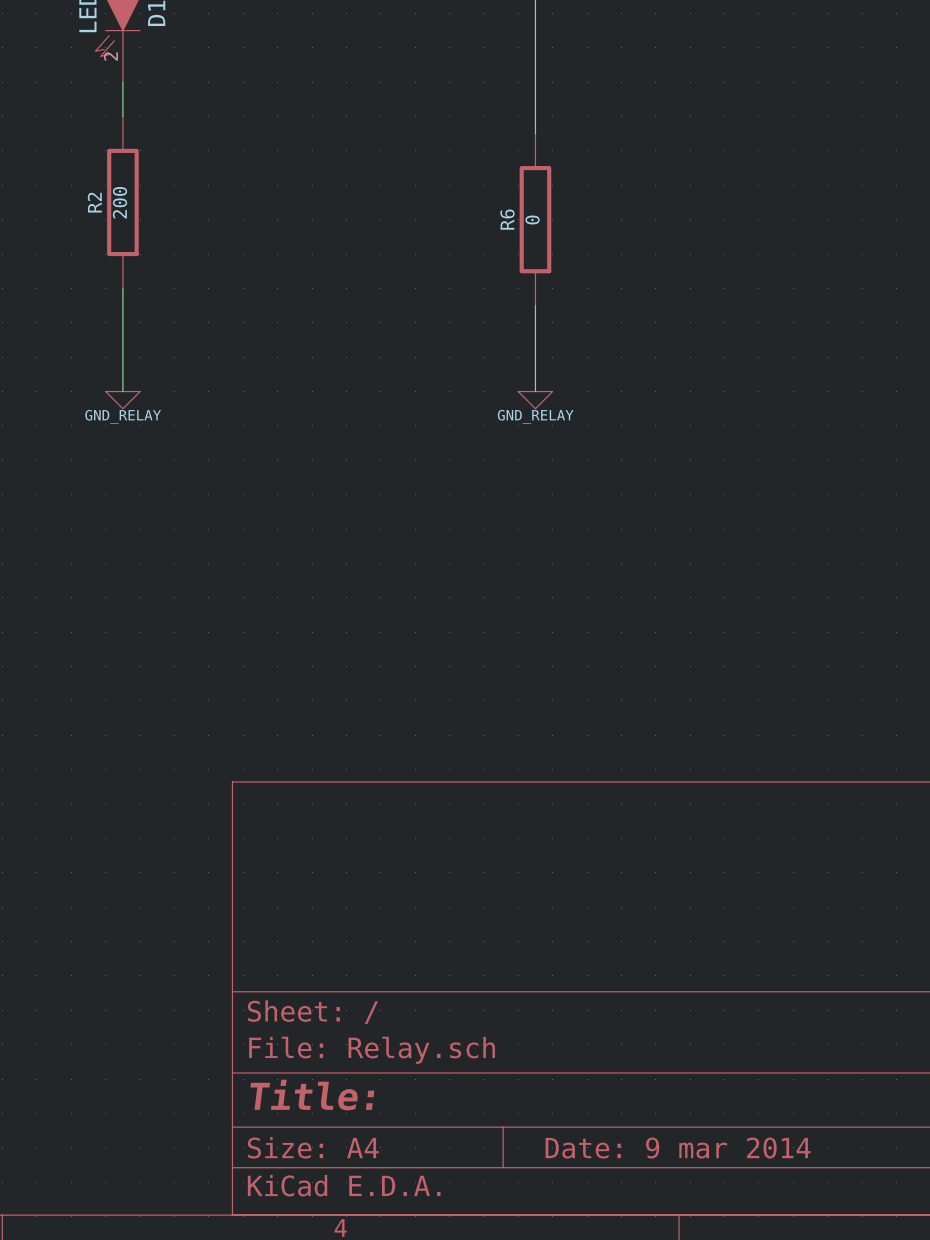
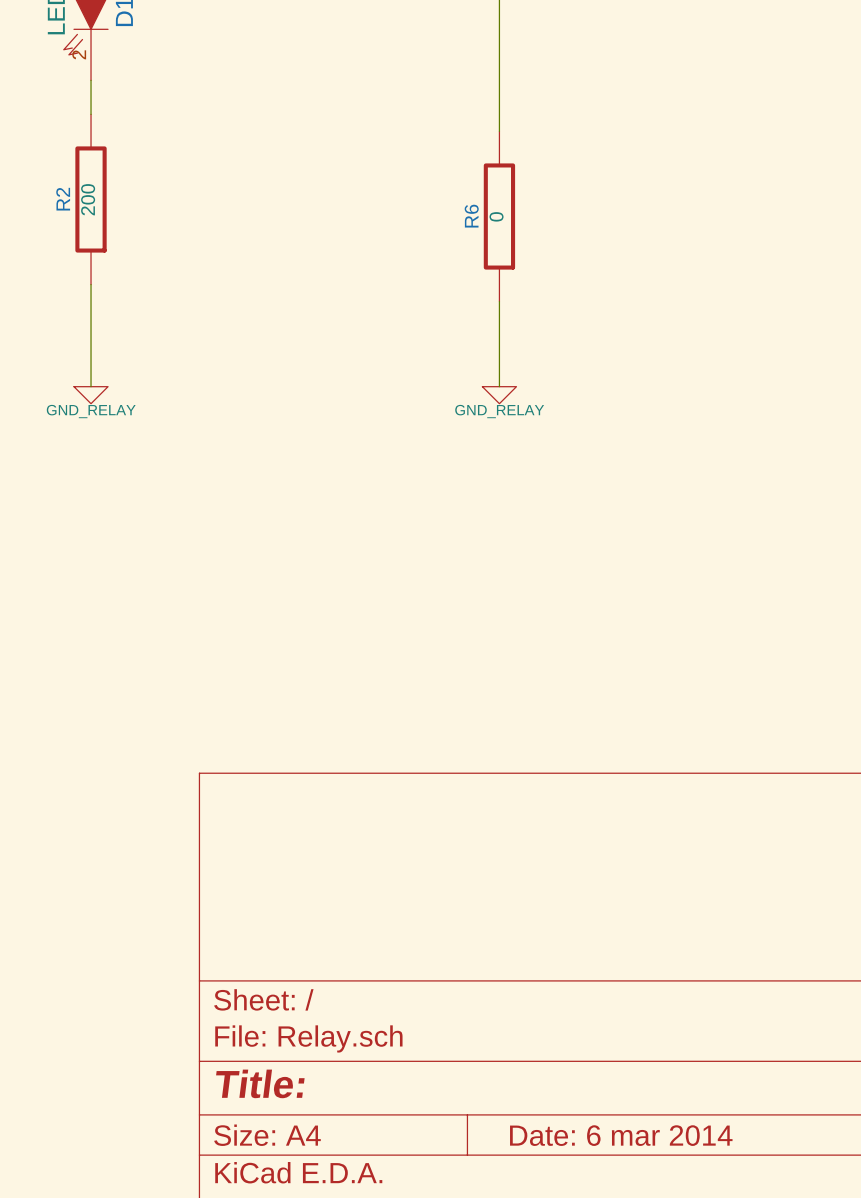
title block: Date: 9 mar 2014 (678, 1148) -> Date: 6 mar 2014 (621, 1135)

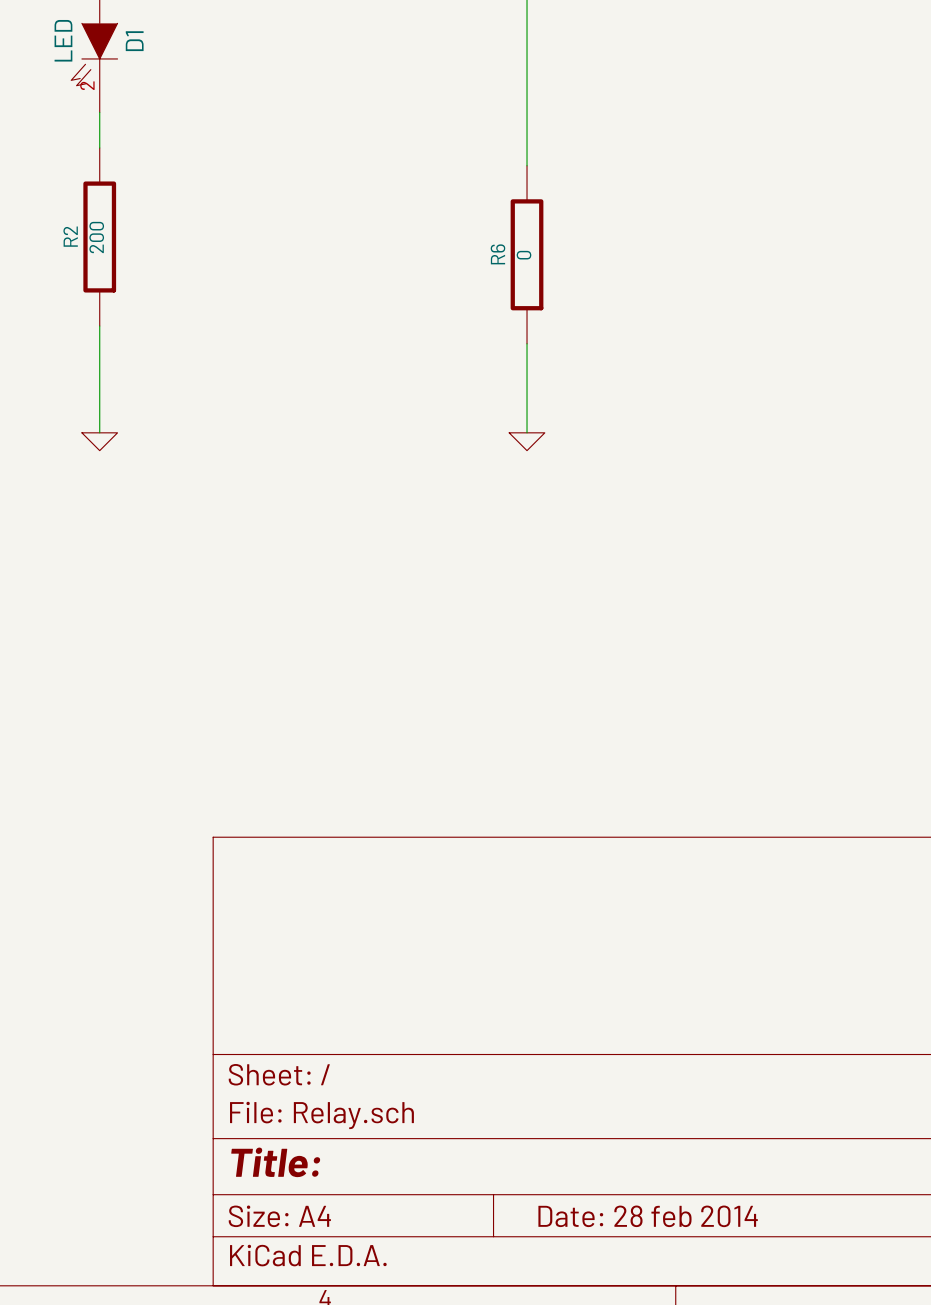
power symbol text: GND_RELAY (91, 411) -> none
power symbol text: GND_RELAY (499, 411) -> none
title block: Date: 6 mar 2014 (621, 1135) -> Date: 28 feb 2014 (648, 1216)

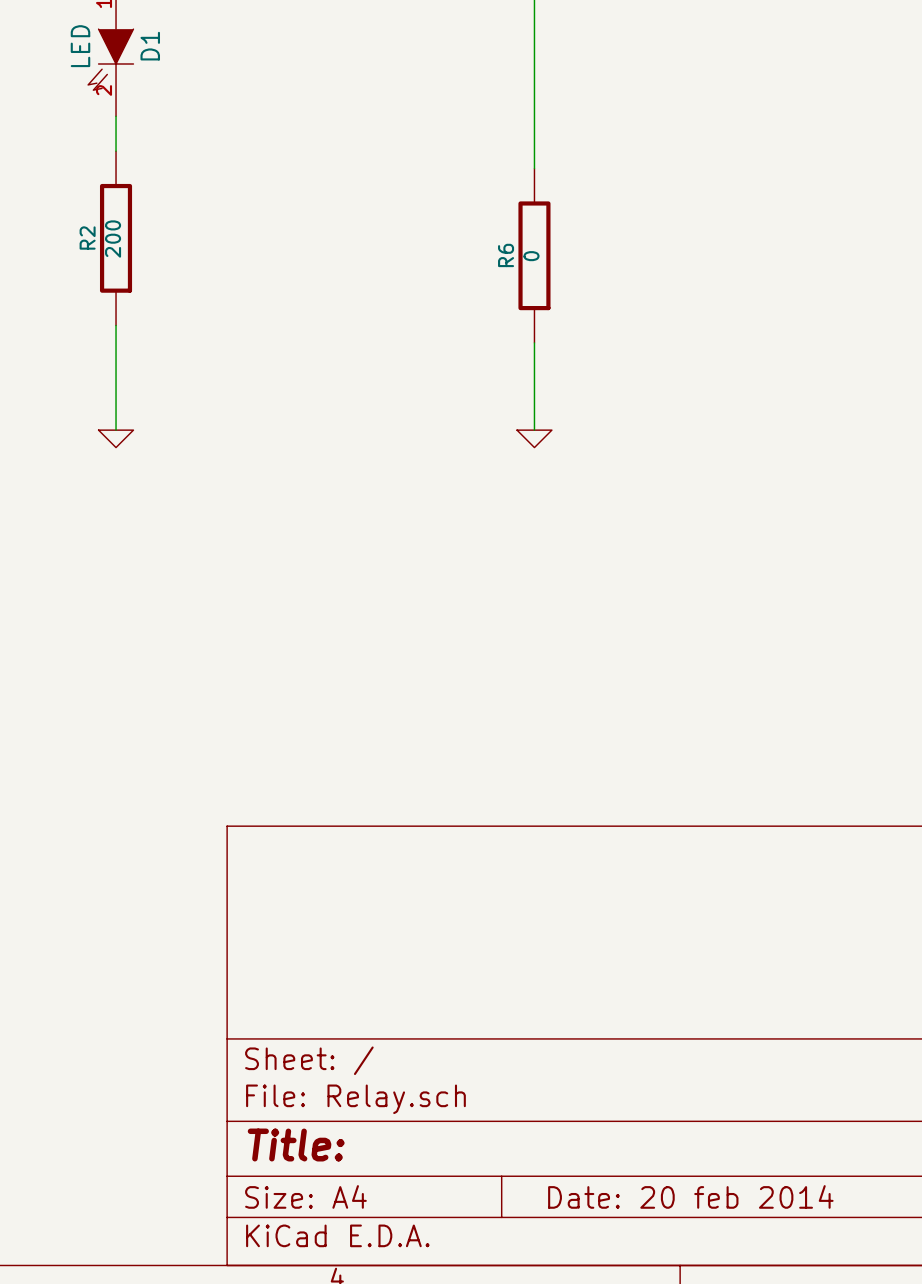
title block: Date: 28 feb 2014 (648, 1216) -> Date: 20 feb 2014 (690, 1196)

